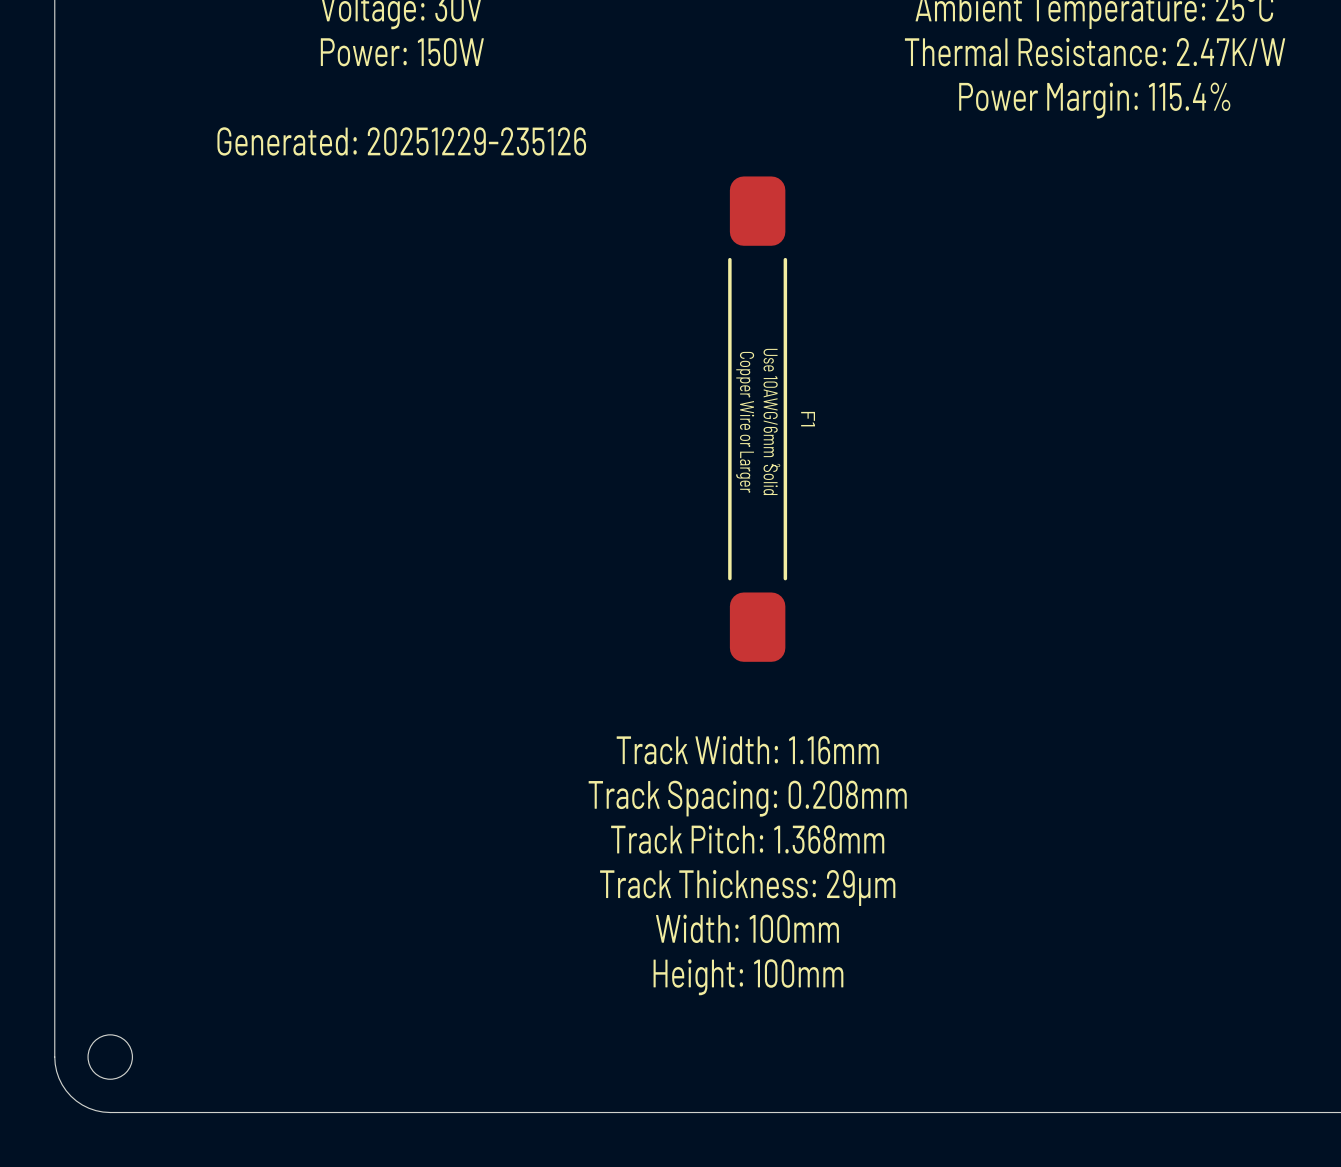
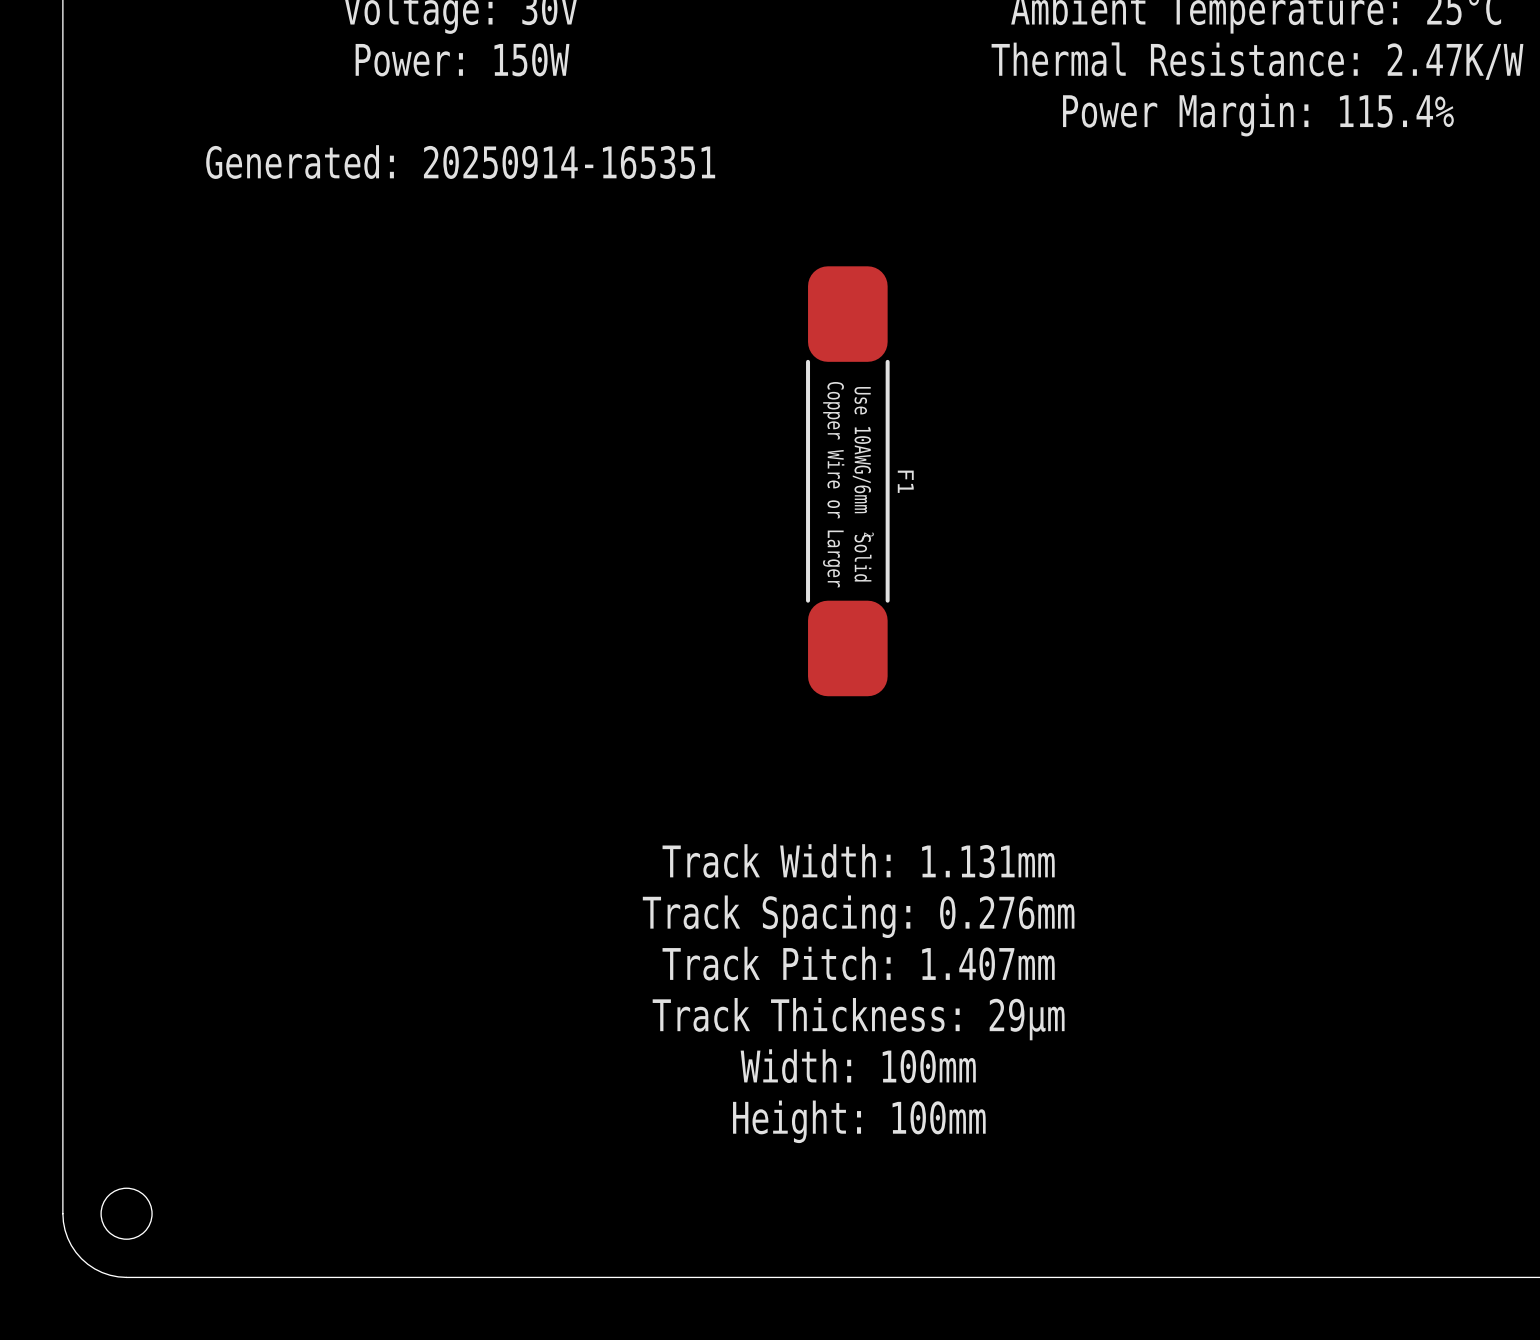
text: Generated: 20251229-235126 (401, 141) -> Generated: 20250914-165351 (460, 162)
F1 footprint: [728, 176, 788, 662] -> [806, 266, 890, 697]
text: Track Width: 1.16mm (747, 750) -> Track Width: 1.131mm (858, 861)
text: Track Spacing: 0.208mm (747, 798) -> Track Spacing: 0.276mm (858, 916)
text: Track Pitch: 1.368mm (747, 839) -> Track Pitch: 1.407mm (858, 963)

